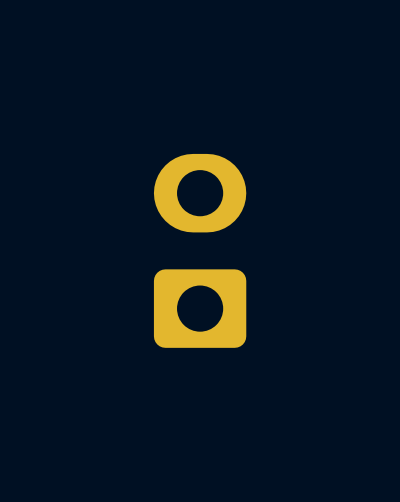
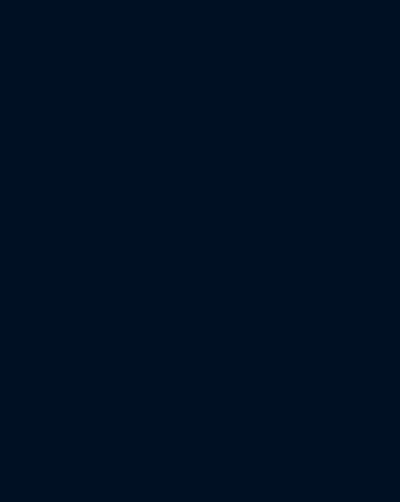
part: (200, 250) -> none

